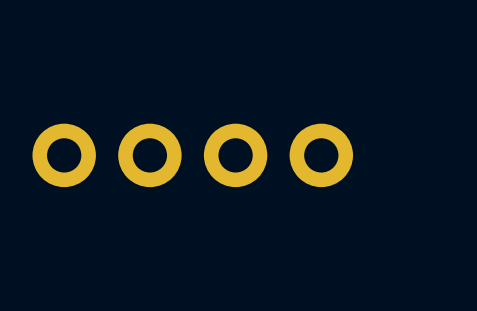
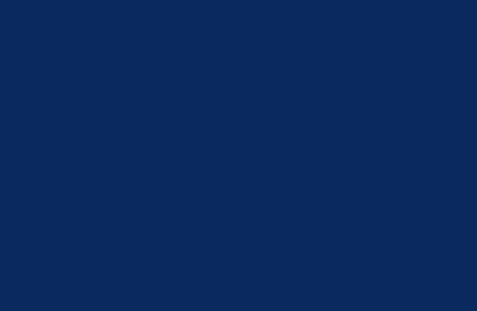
part: (107, 155) -> none
part: (278, 155) -> none

